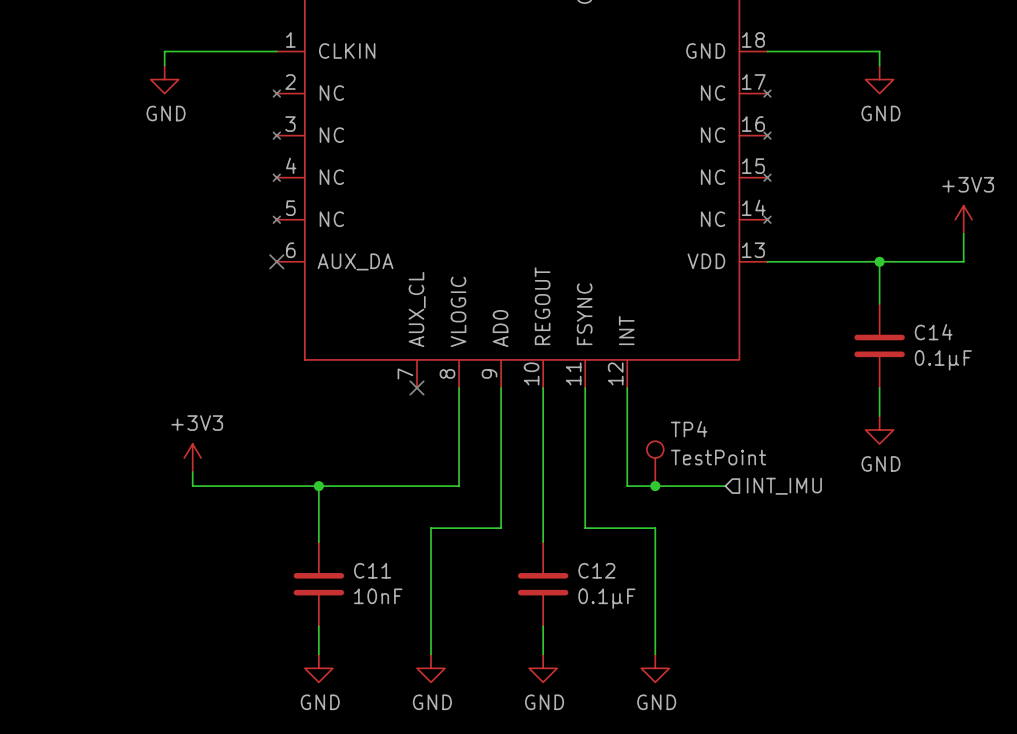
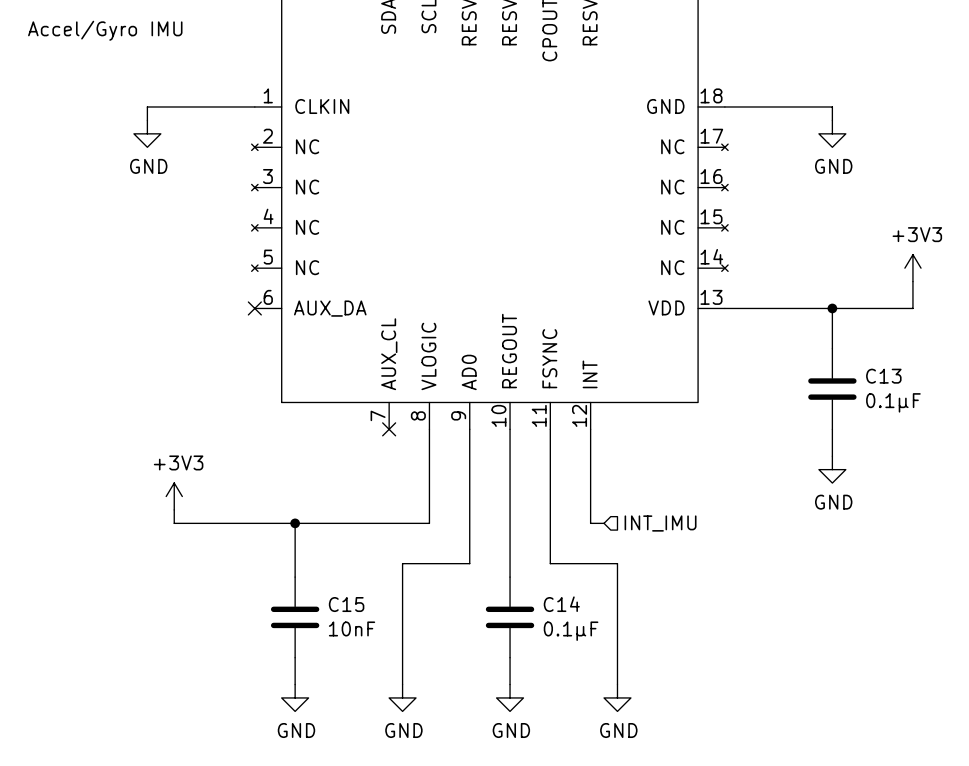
C14 name: C14 (933, 332) -> C13 (883, 376)
TP4: TestPoint (655, 463) -> none
wire: (641, 486) (725, 486) -> none
junction: (655, 486) -> none
hierarchical label position: INT_IMU (784, 486) -> INT_IMU (660, 523)
C11 name: C11 (372, 570) -> C15 (346, 604)
C12 name: C12 (596, 570) -> C14 (561, 604)

